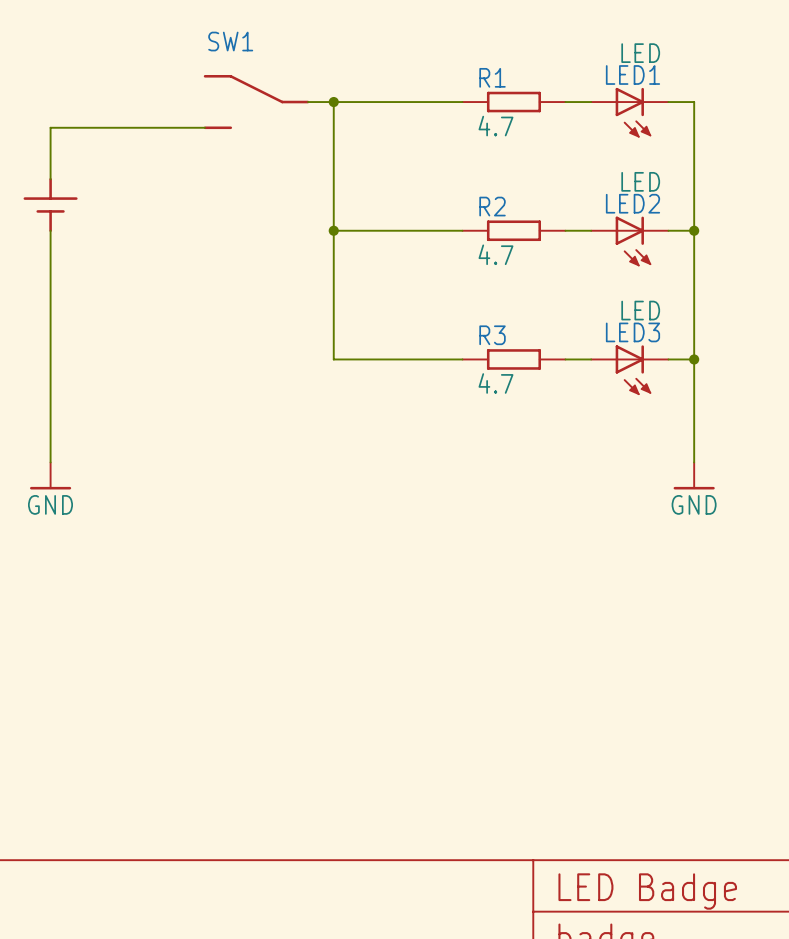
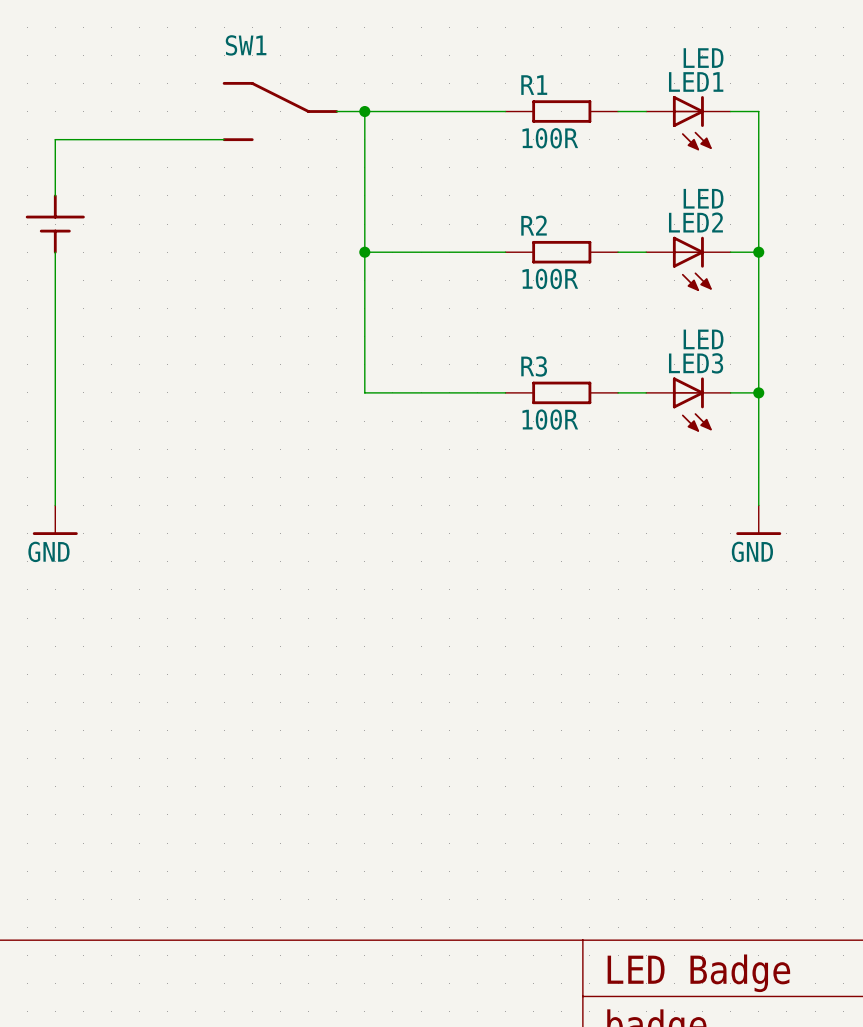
R1 value: 4.7 (495, 126) -> 100R (550, 138)
R2 value: 4.7 (495, 254) -> 100R (550, 278)
R3 value: 4.7 (495, 383) -> 100R (550, 419)

